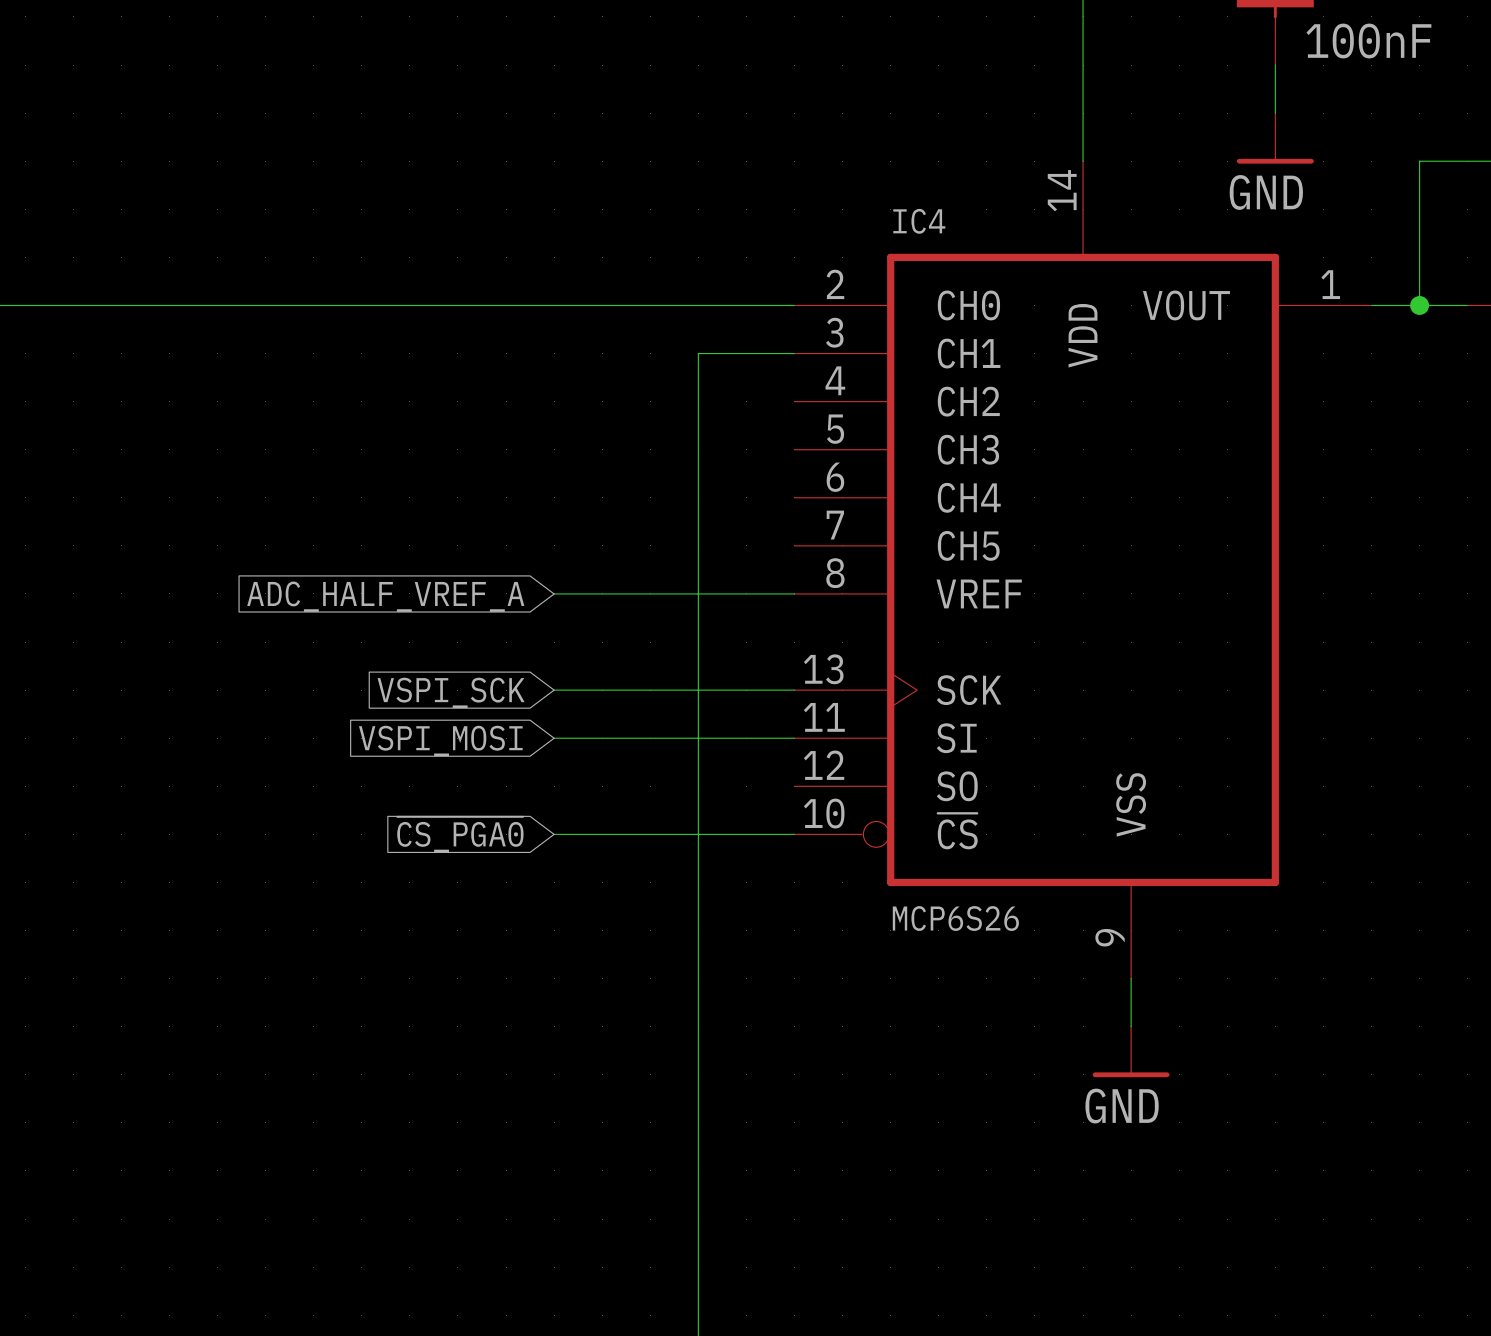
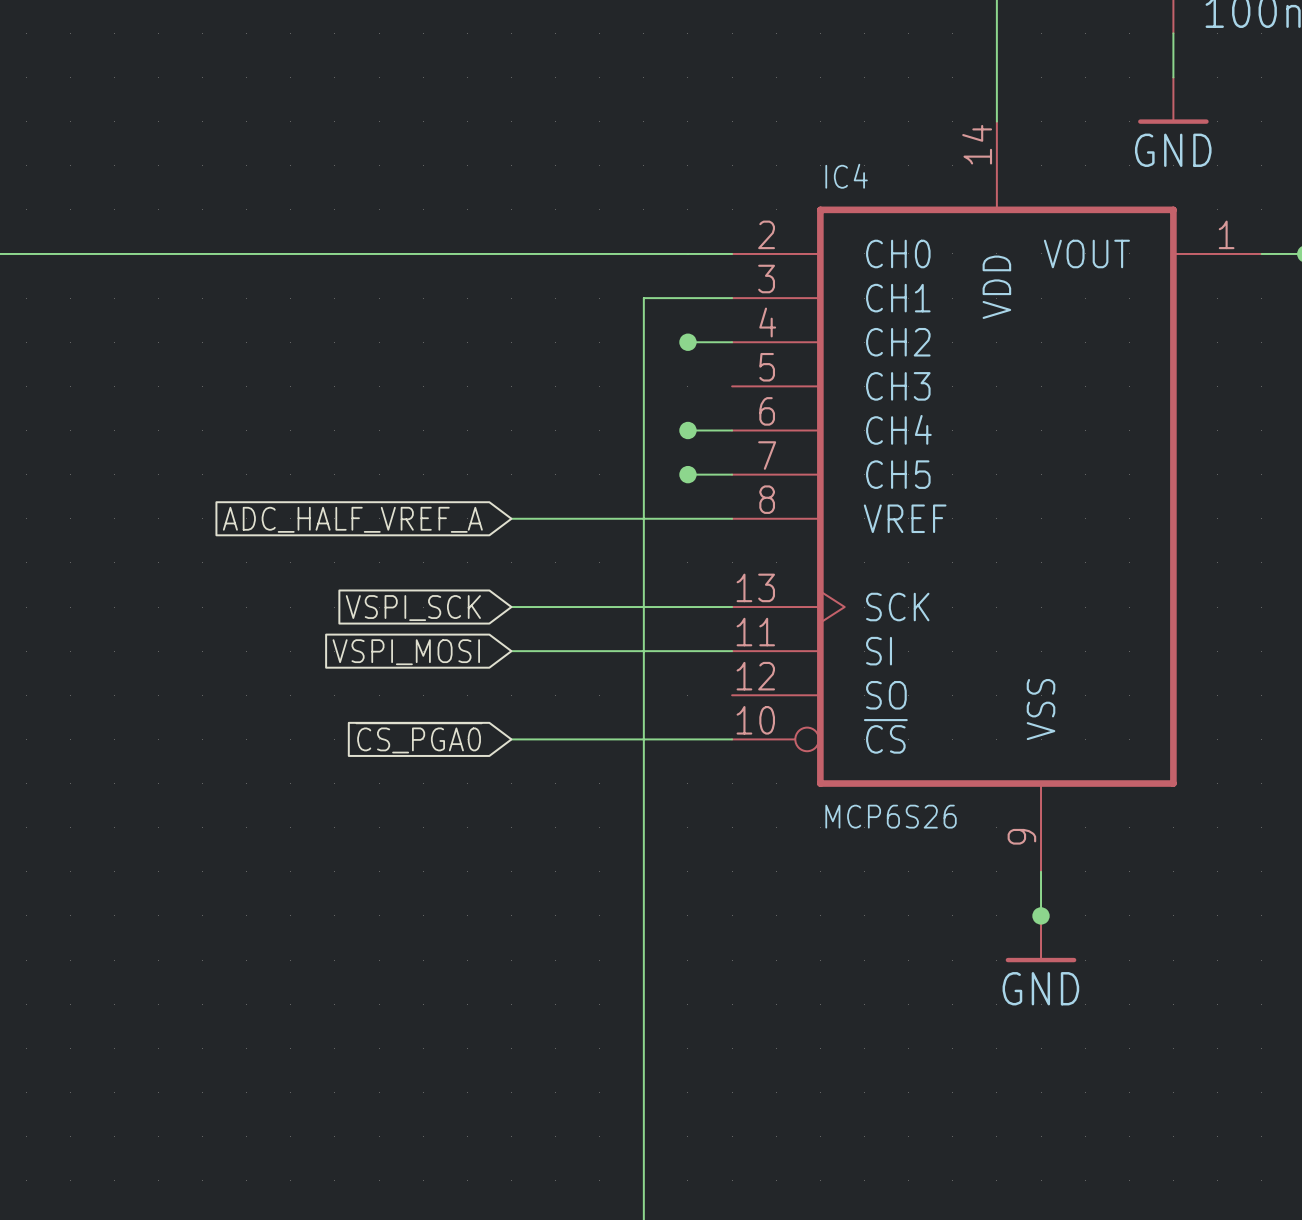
wire: none -> (687, 342) (732, 342)
junction: none -> (687, 342)
wire: none -> (687, 430) (732, 430)
junction: none -> (687, 430)
wire: none -> (687, 474) (732, 474)
junction: none -> (687, 474)
junction: none -> (1041, 915)

